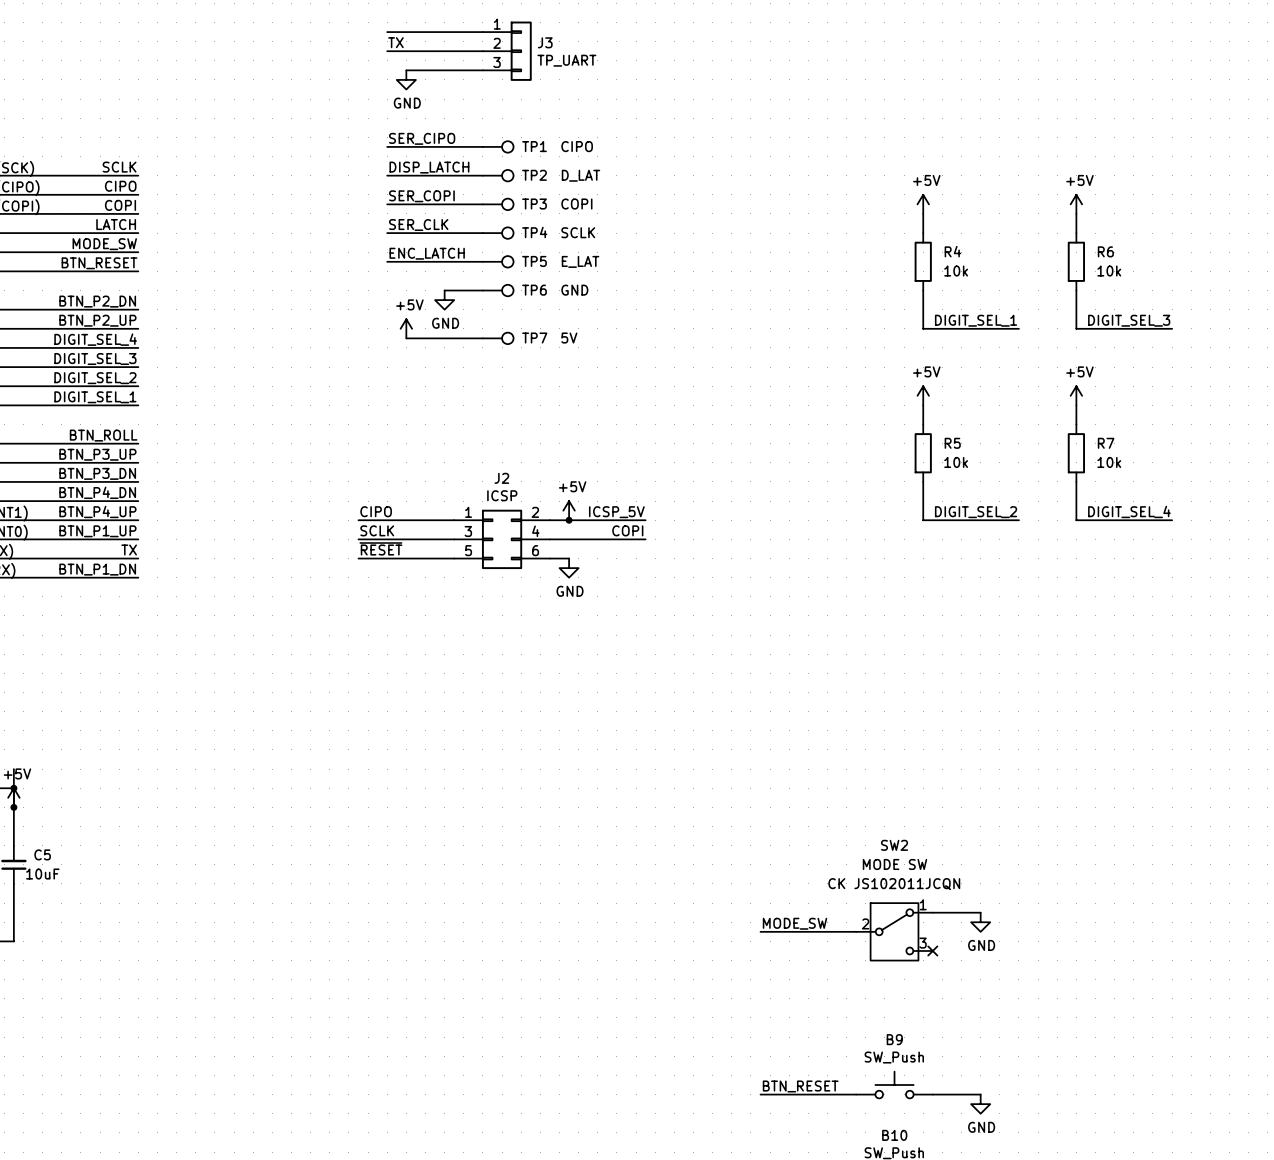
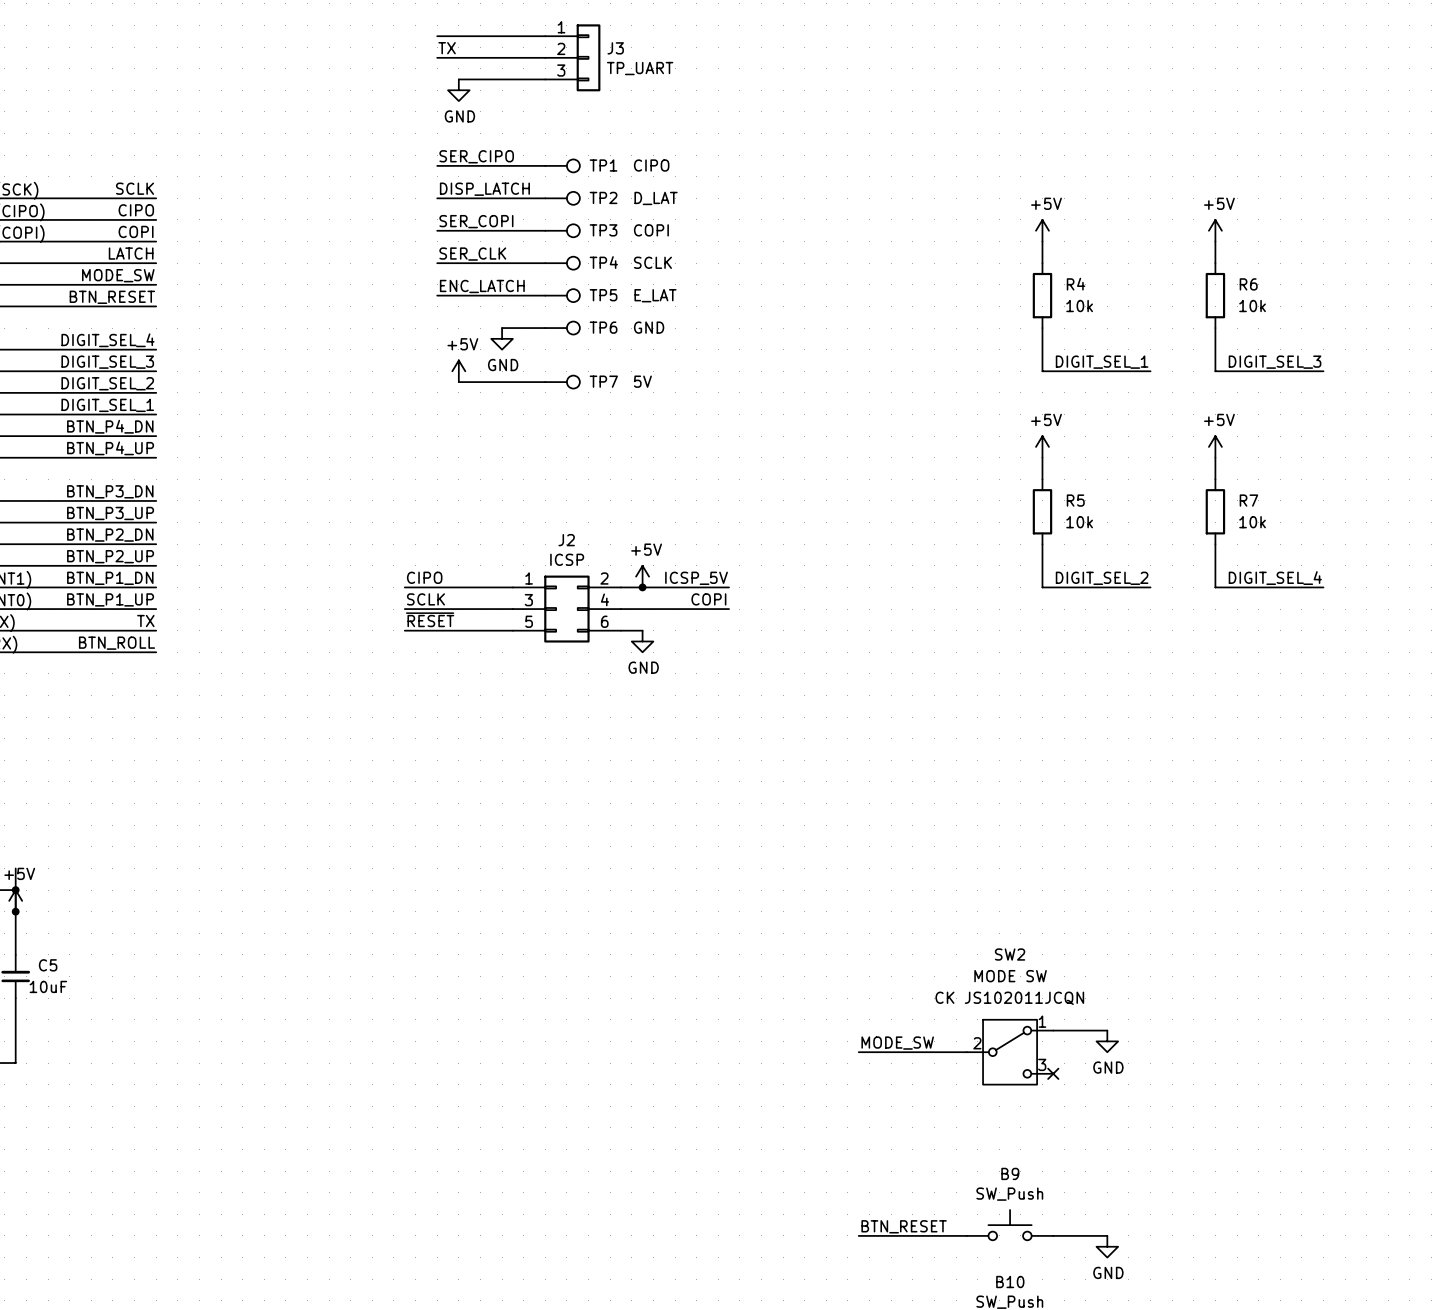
label: BTN_P2_DN (97, 301) -> DIGIT_SEL_4 (107, 340)
label: BTN_P2_UP (97, 320) -> DIGIT_SEL_3 (107, 362)
label: DIGIT_SEL_4 (95, 339) -> DIGIT_SEL_2 (107, 383)
label: DIGIT_SEL_3 (95, 359) -> DIGIT_SEL_1 (107, 405)
label: DIGIT_SEL_2 (95, 378) -> BTN_P4_DN (110, 426)
label: DIGIT_SEL_1 (95, 397) -> BTN_P4_UP (110, 448)
label: BTN_ROLL (103, 435) -> BTN_P3_DN (110, 491)
label: BTN_P3_DN (97, 473) -> BTN_P2_DN (110, 535)
label: BTN_P4_DN (97, 492) -> BTN_P2_UP (110, 556)
label: BTN_P4_UP (97, 511) -> BTN_P1_DN (110, 578)
label: BTN_P1_DN (97, 569) -> BTN_ROLL (117, 643)

